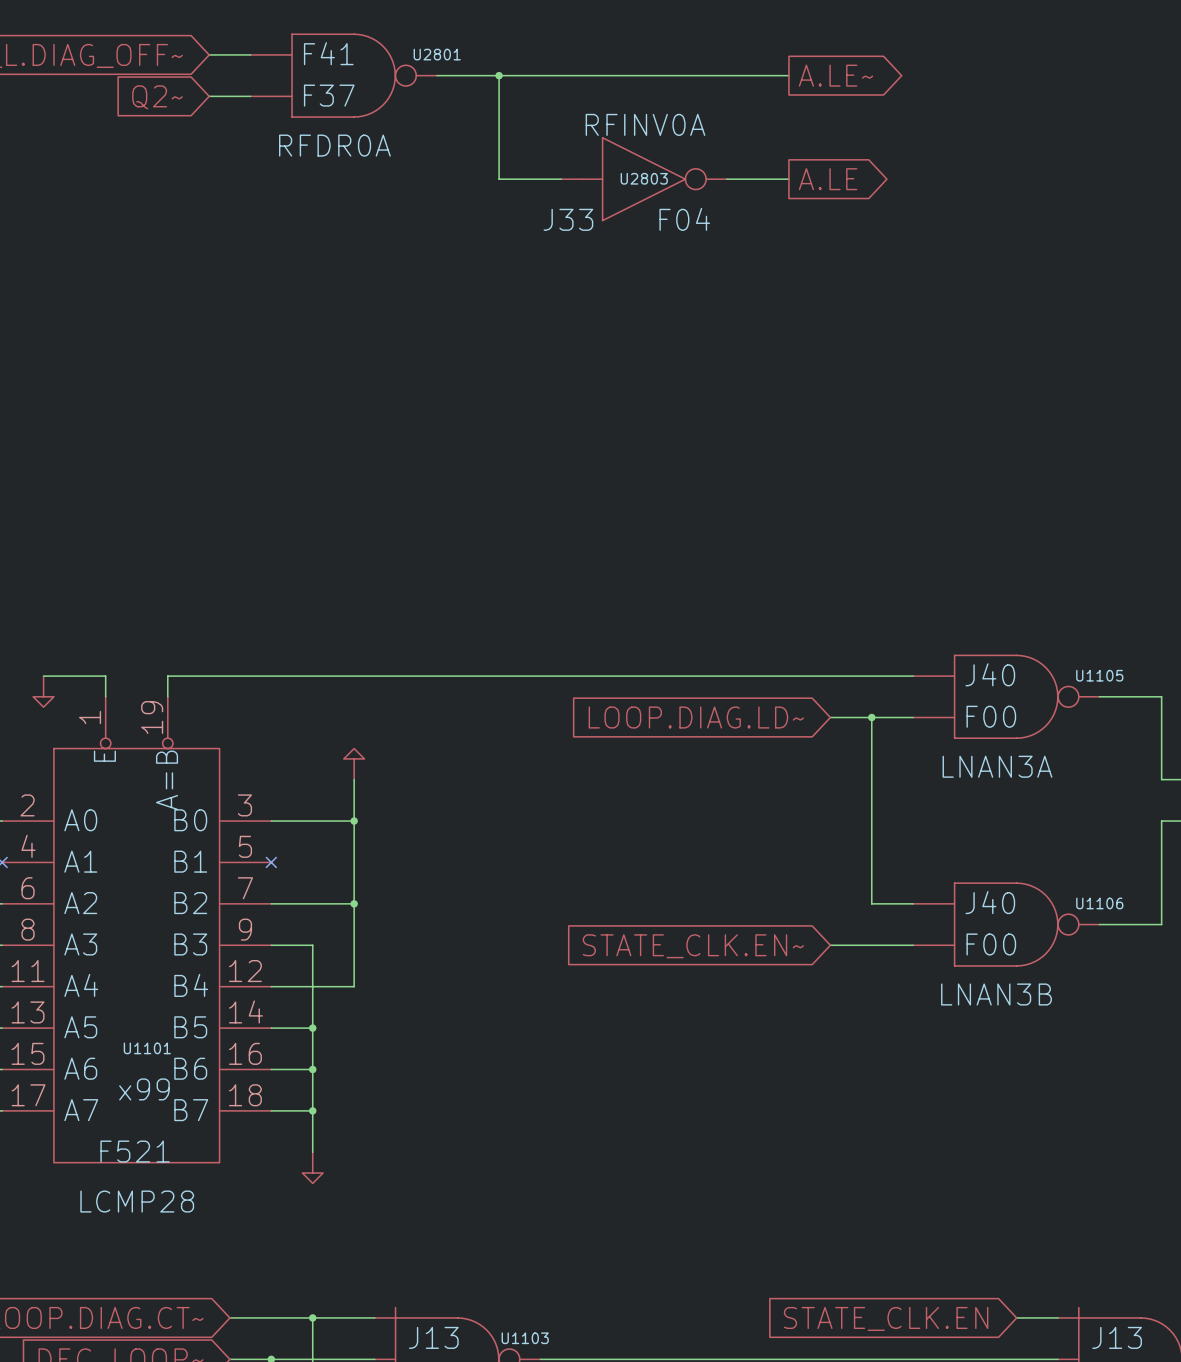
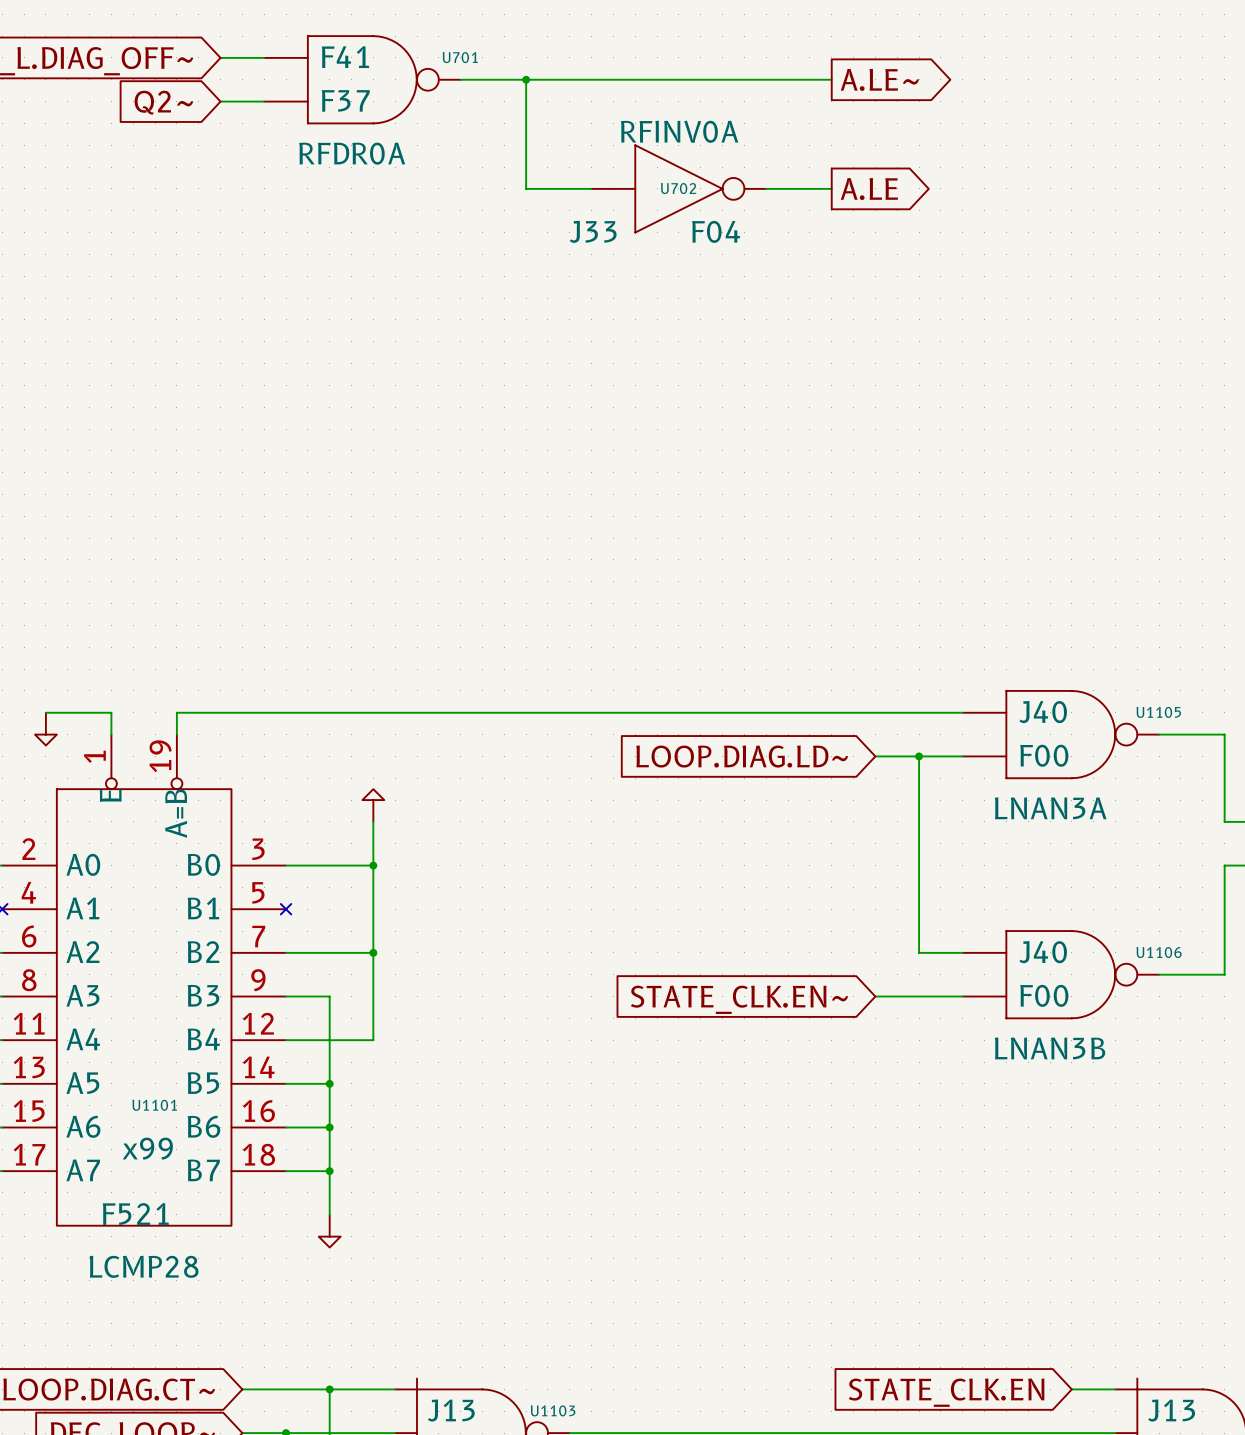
U2801 name: U2801 (437, 54) -> U701 (460, 57)
U2803 name: U2803 (644, 178) -> U702 (678, 188)

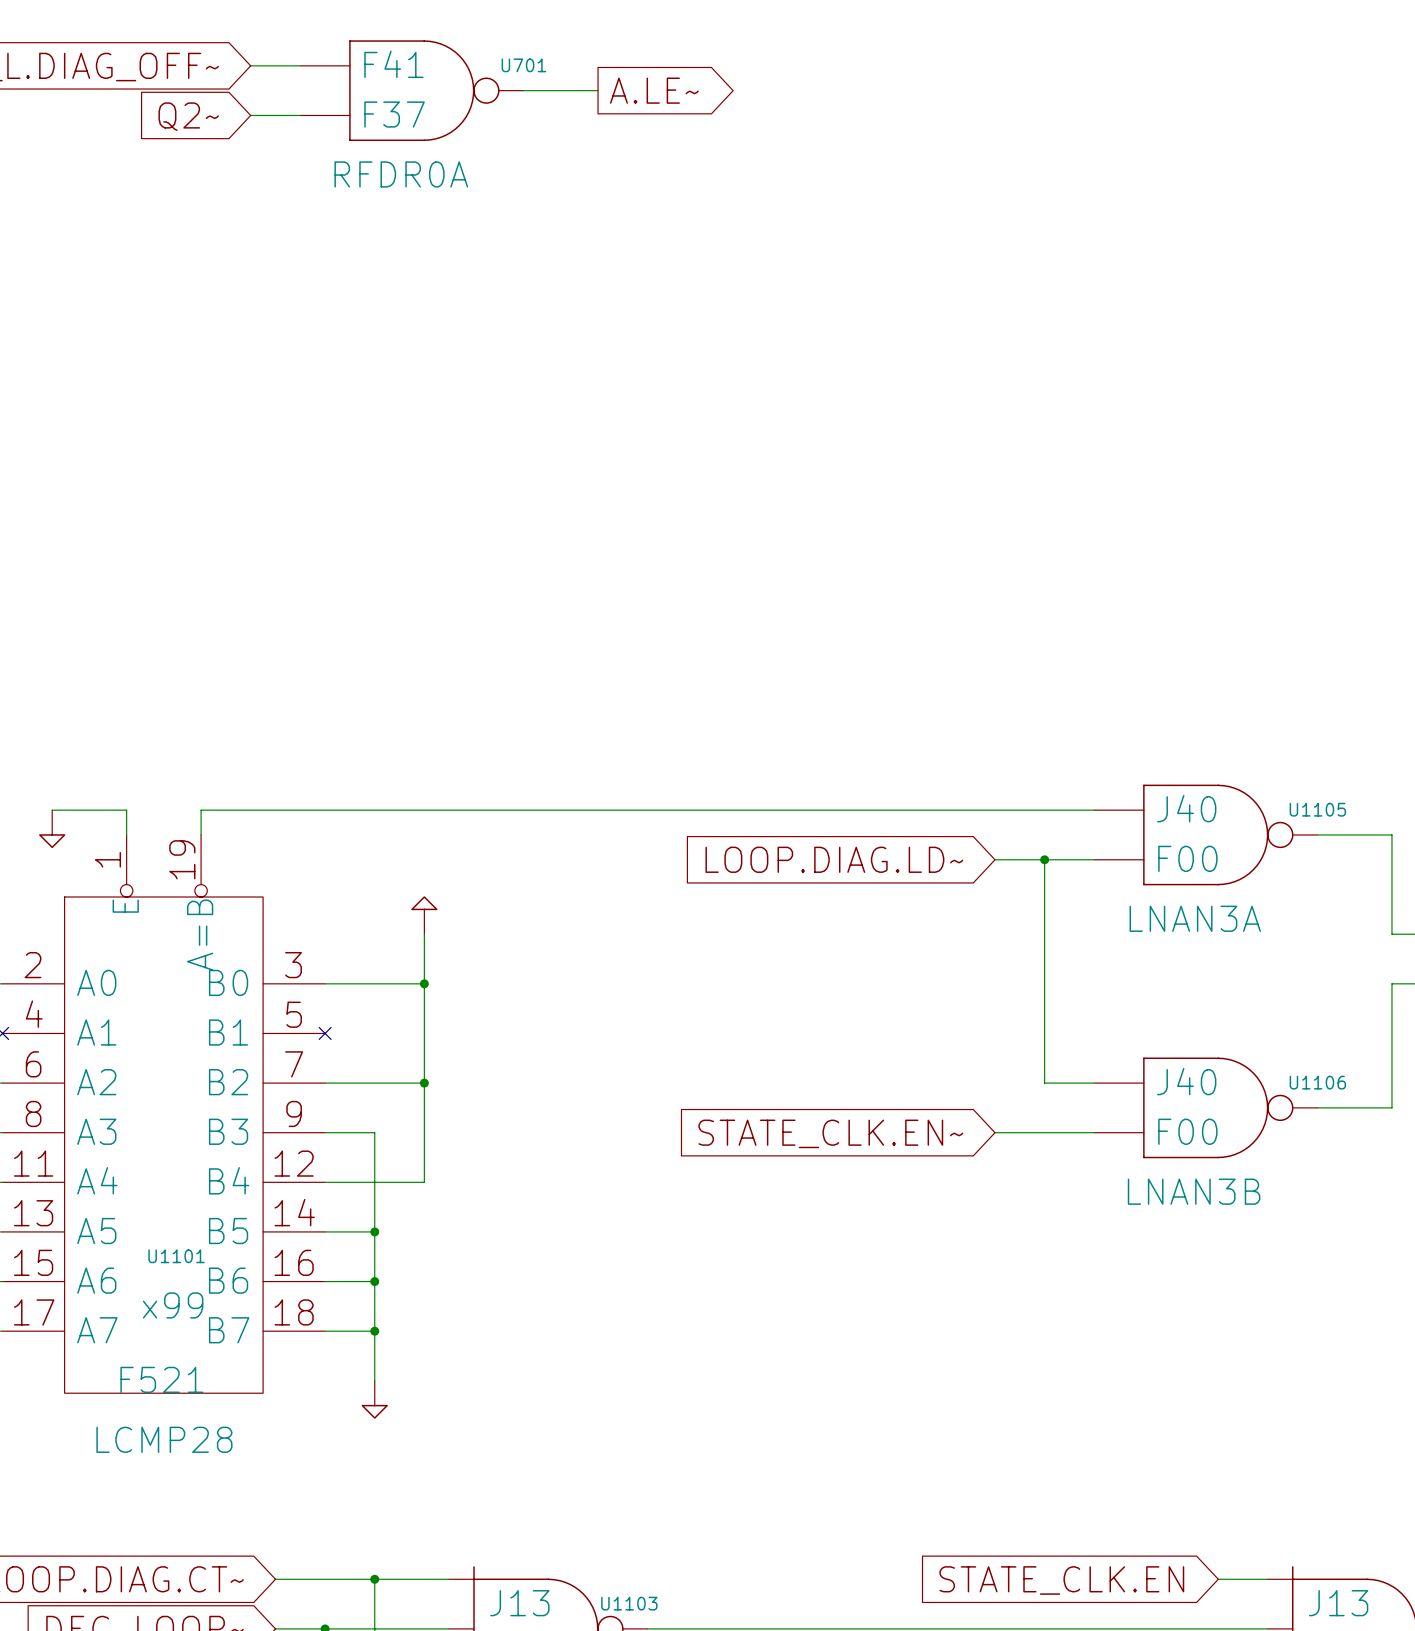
junction: (526, 79) -> none
global label: none -> A.LE~ (654, 90)
wire: (831, 79) (526, 79) (526, 188) (591, 188) -> none
global label: A.LE~ (879, 79) -> none
U702: F04 (678, 188) -> none
wire: (766, 188) (831, 188) -> none
global label: A.LE (869, 189) -> none

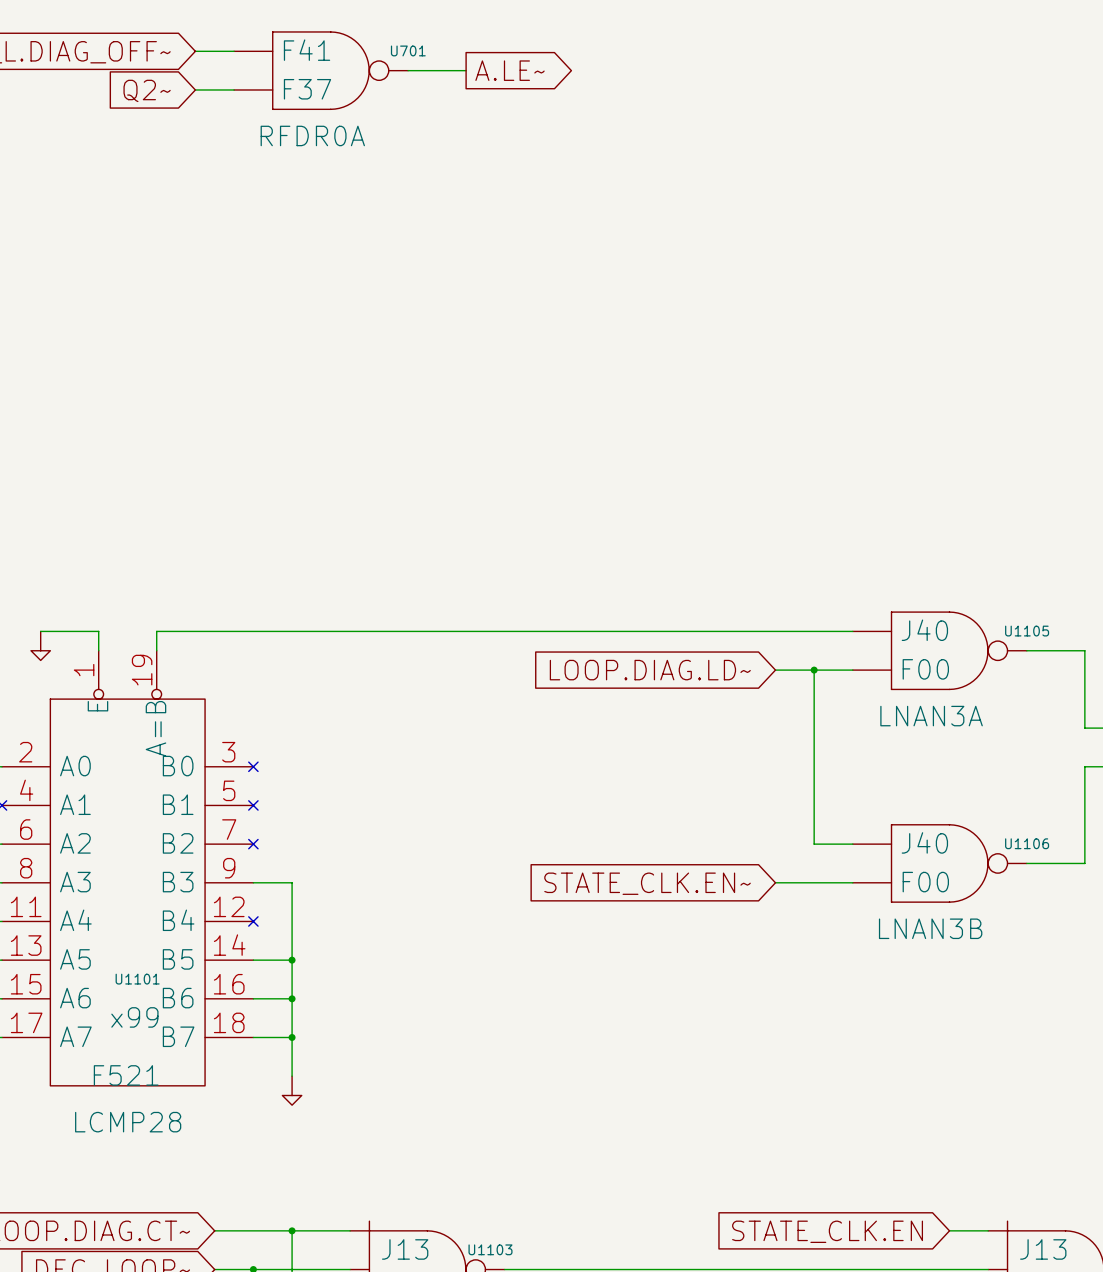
power symbol: (424, 915) -> none
wire: (424, 934) (424, 1182) (325, 1182) -> none
wire: (325, 983) (424, 983) -> none
no-connect mark: none -> (253, 766)
junction: (424, 983) -> none
wire: (325, 1083) (424, 1083) -> none
no-connect mark: none -> (253, 844)
junction: (424, 1083) -> none
no-connect mark: none -> (253, 921)

